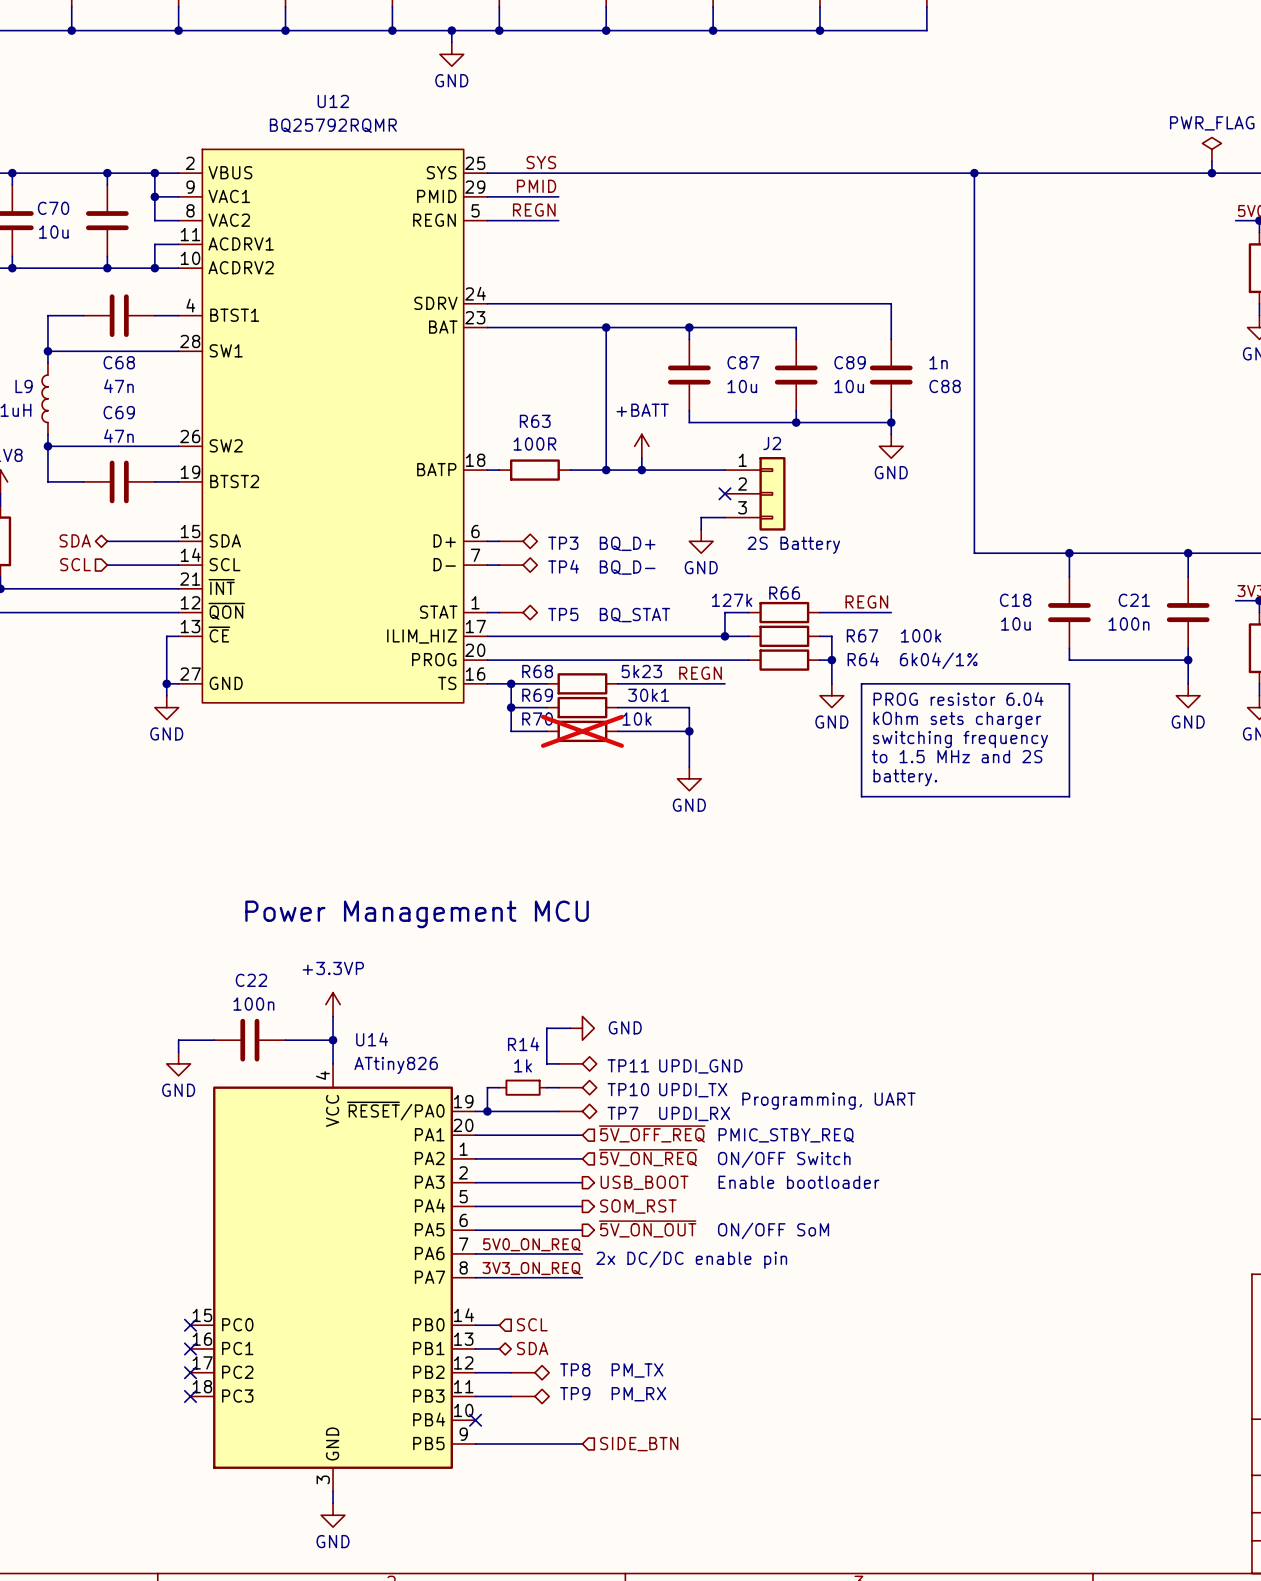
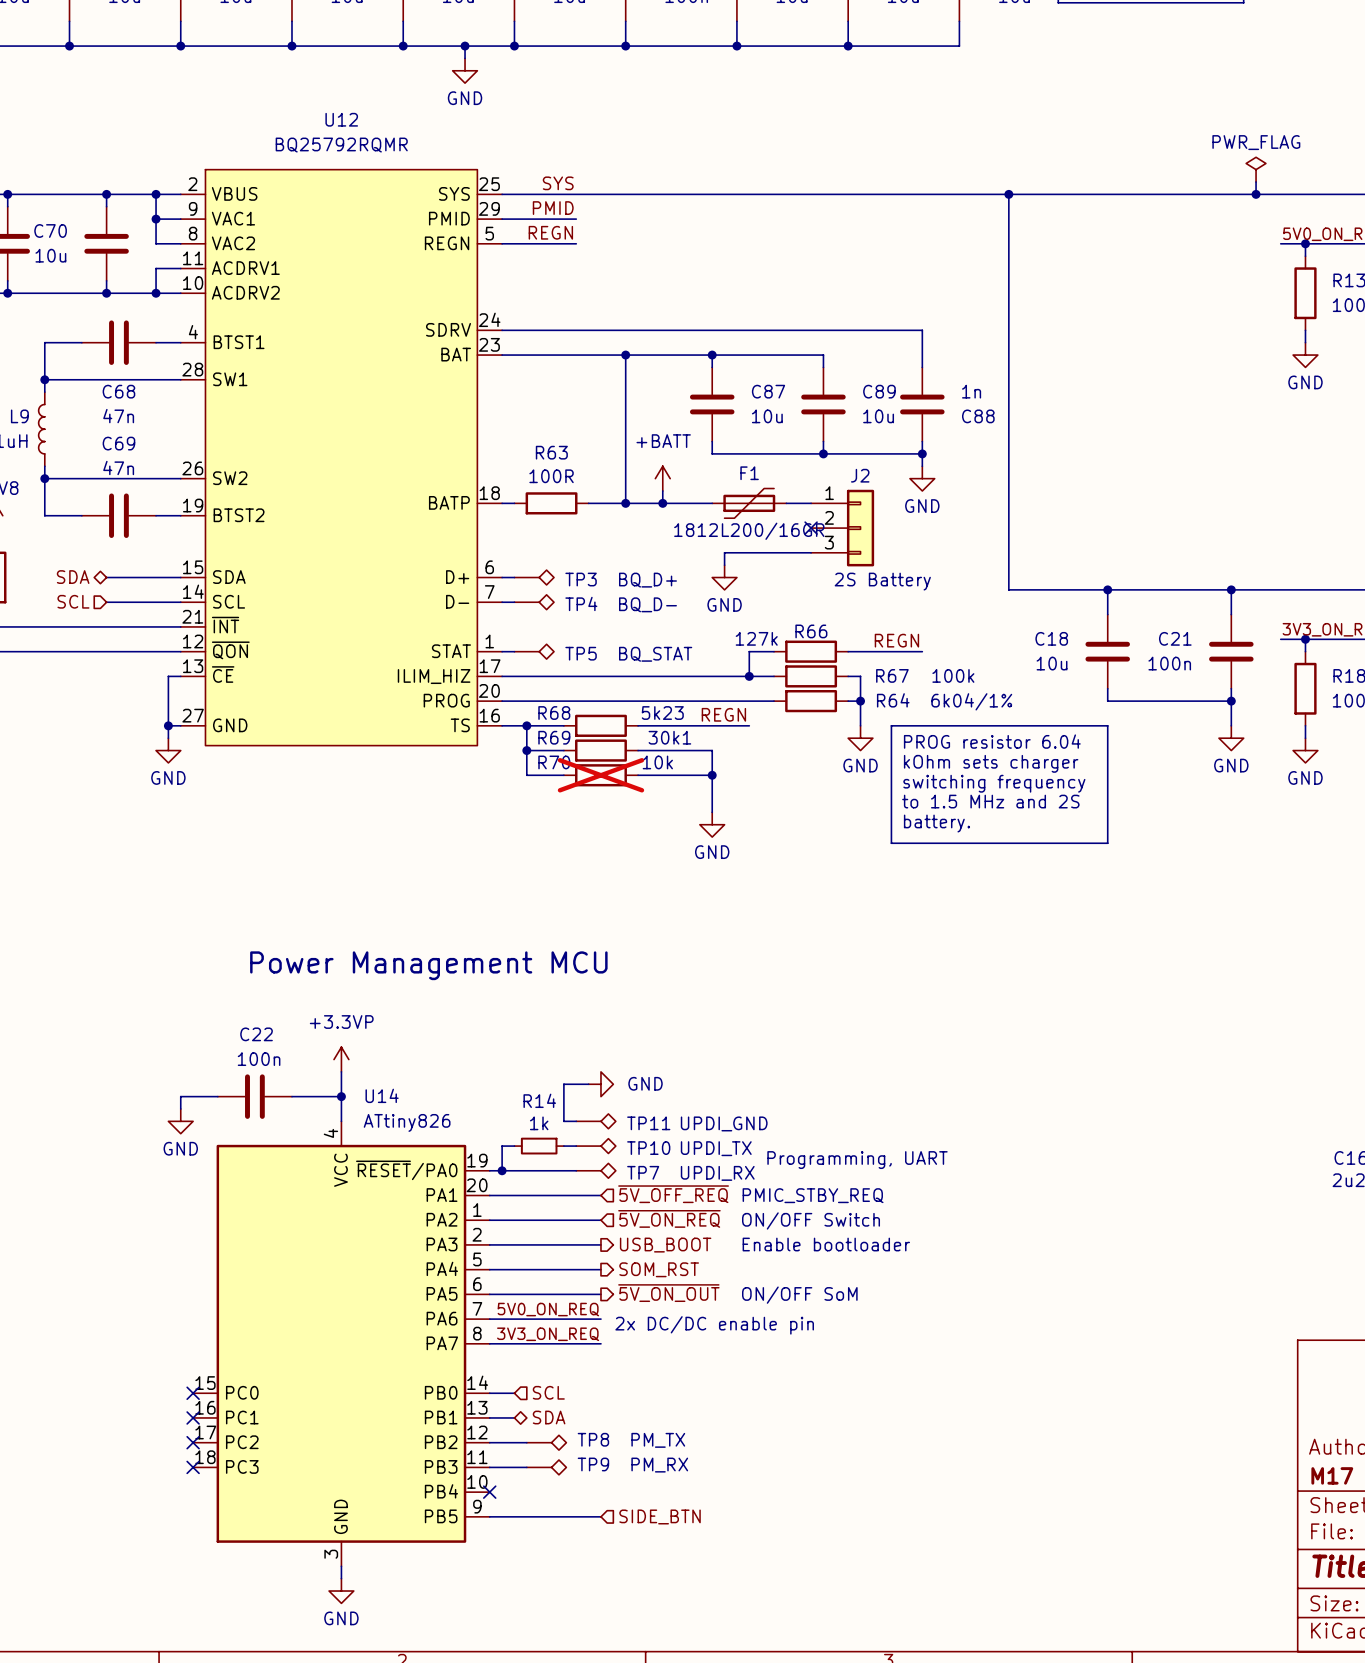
F1: none -> 1812L200/16GR (749, 503)
no-connect mark: (724, 493) -> none
J2 position: (755, 493) -> (842, 528)
no-connect mark: none -> (811, 528)

